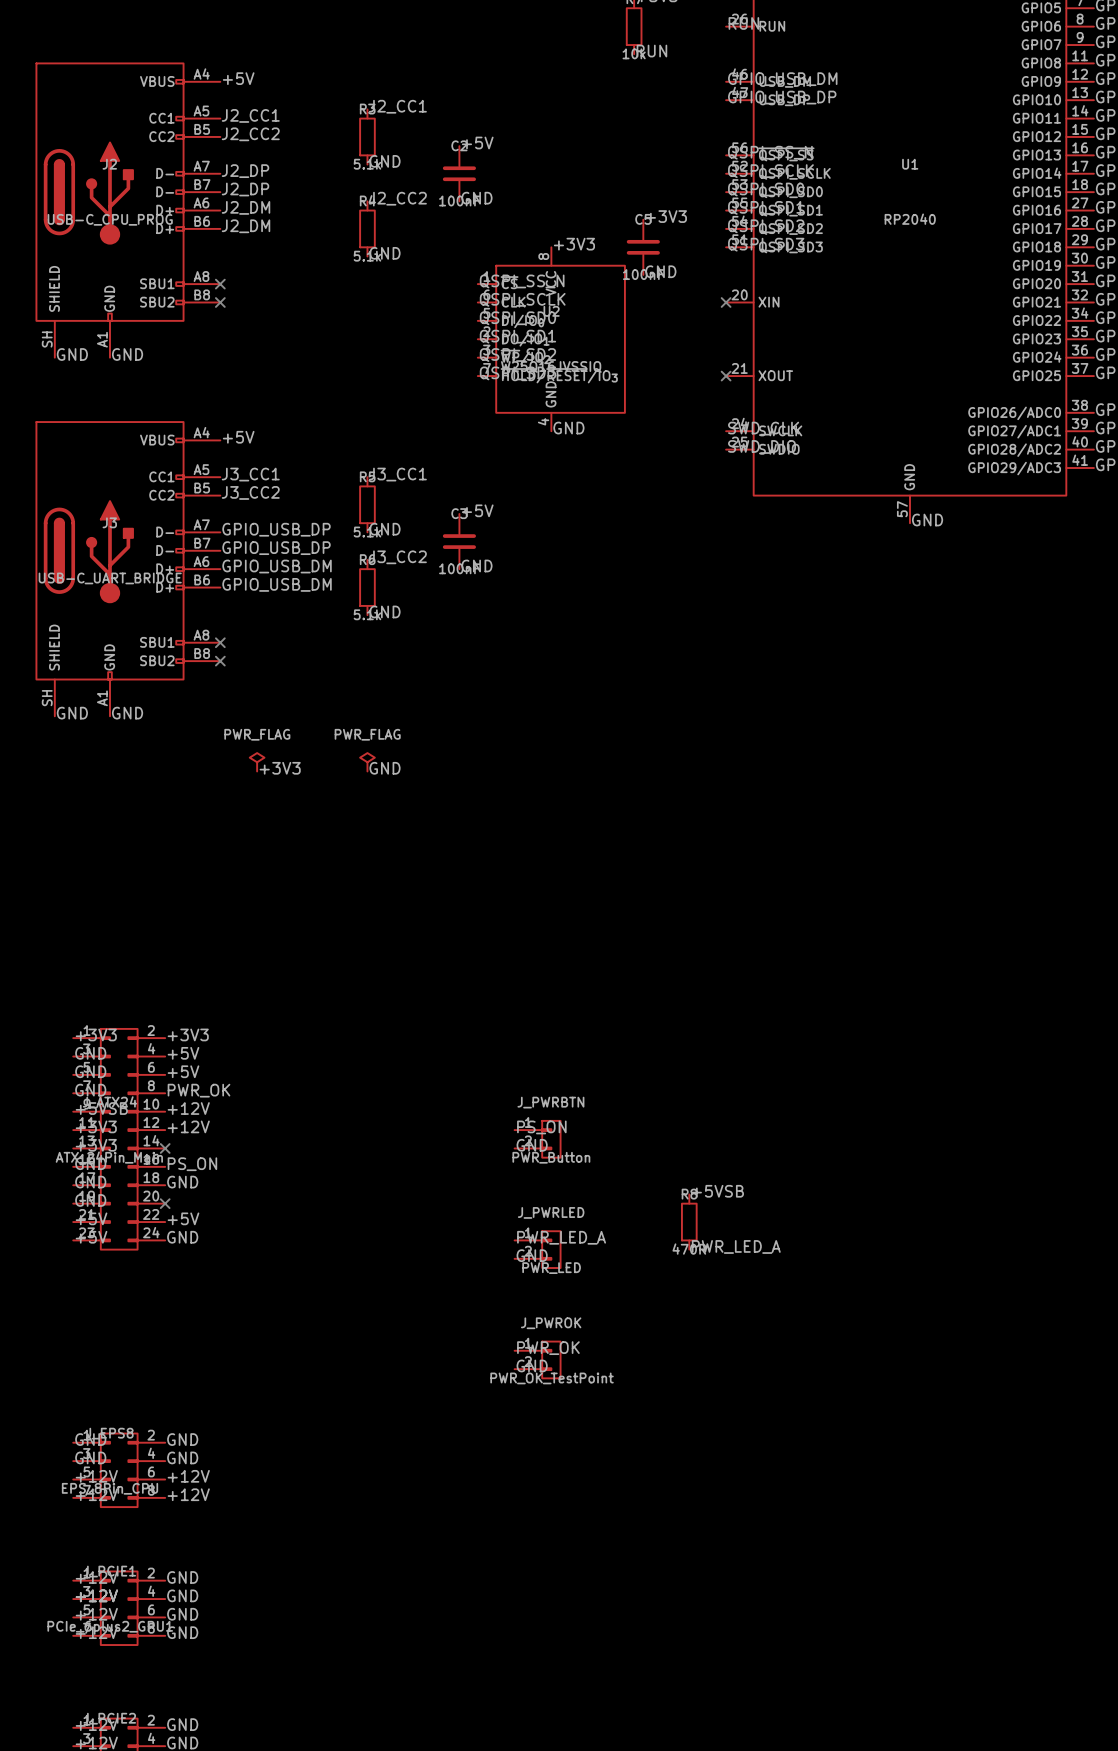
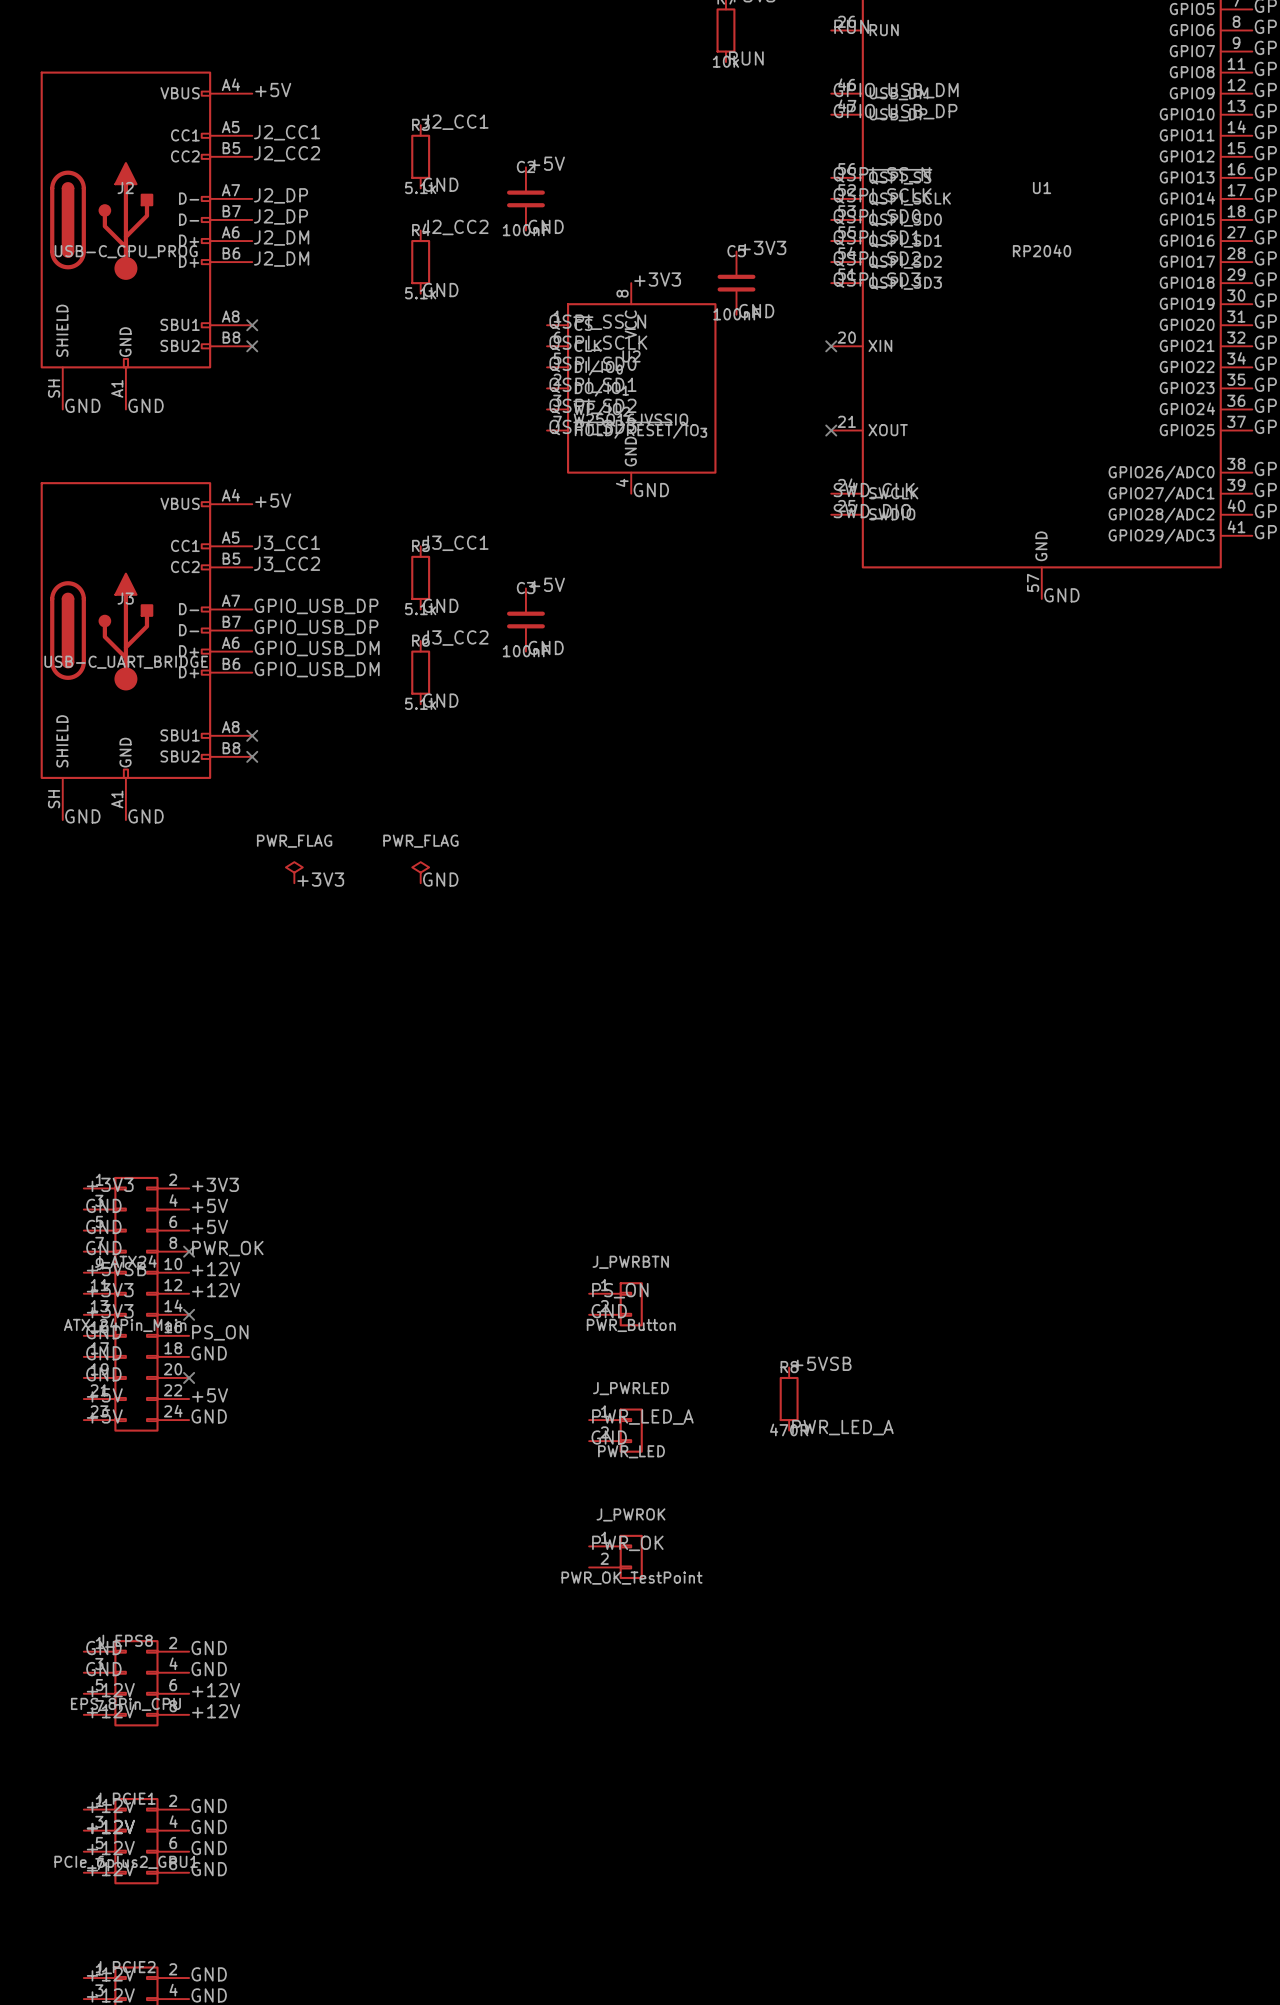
no-connect mark: none -> (189, 1251)
label: GND (532, 1365) -> none

